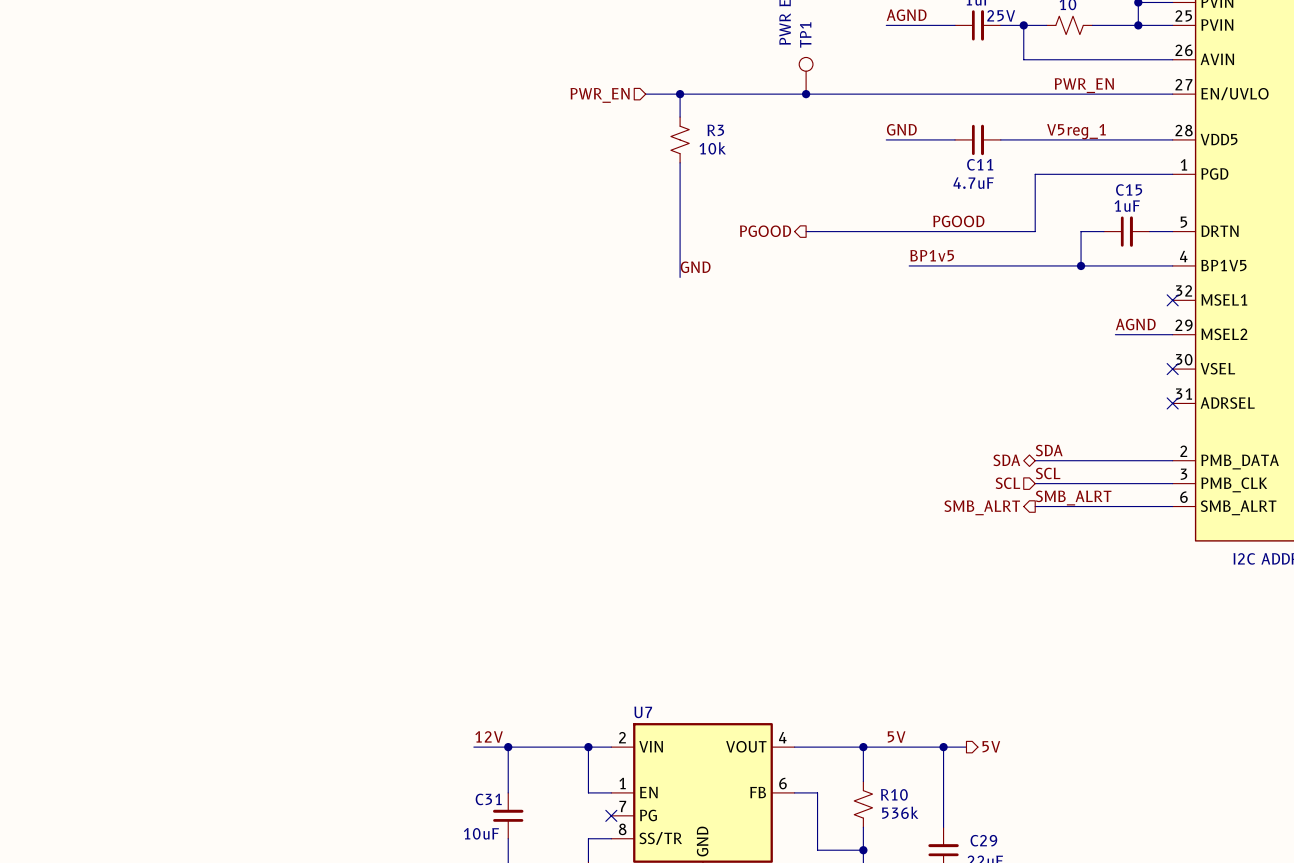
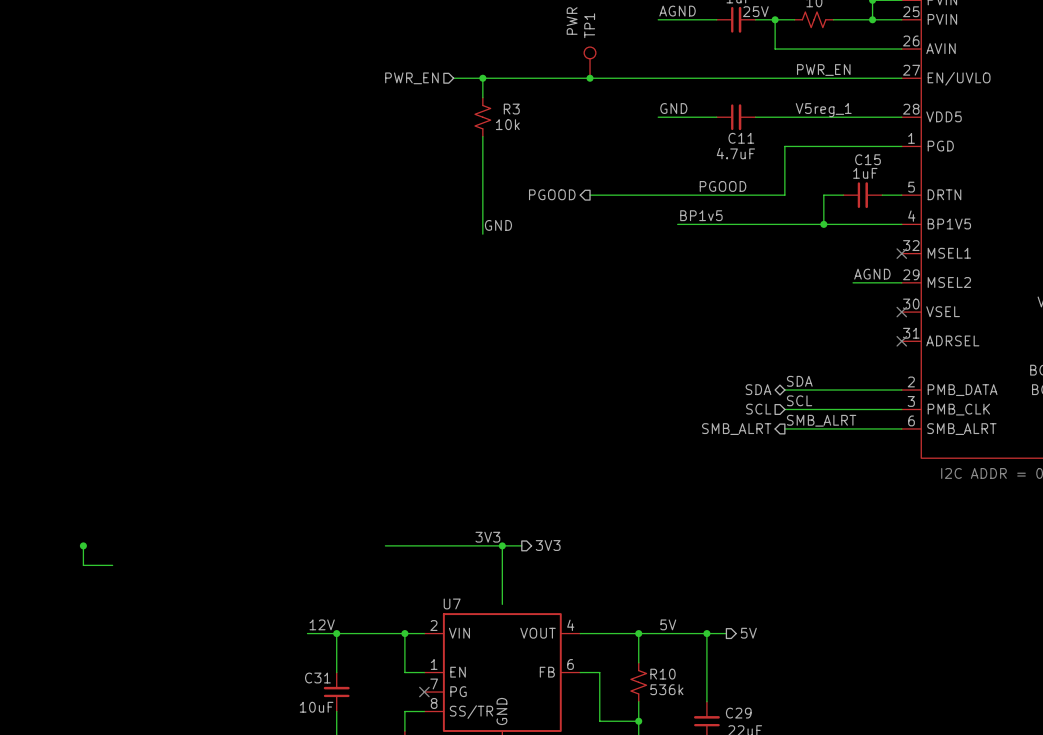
label: none -> 3V3 (487, 537)
hierarchical label: none -> 3V3 (548, 545)
wire: none -> (83, 545) (83, 565) (112, 565)
junction: none -> (83, 545)
wire: none -> (385, 545) (521, 545)
wire: none -> (502, 545) (502, 604)
junction: none -> (502, 545)

